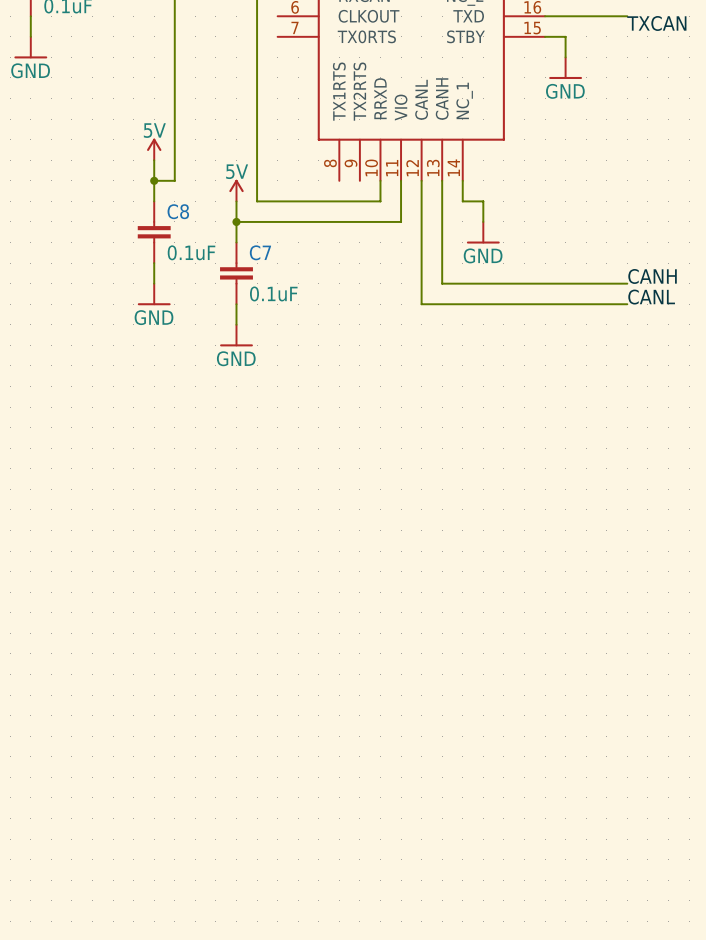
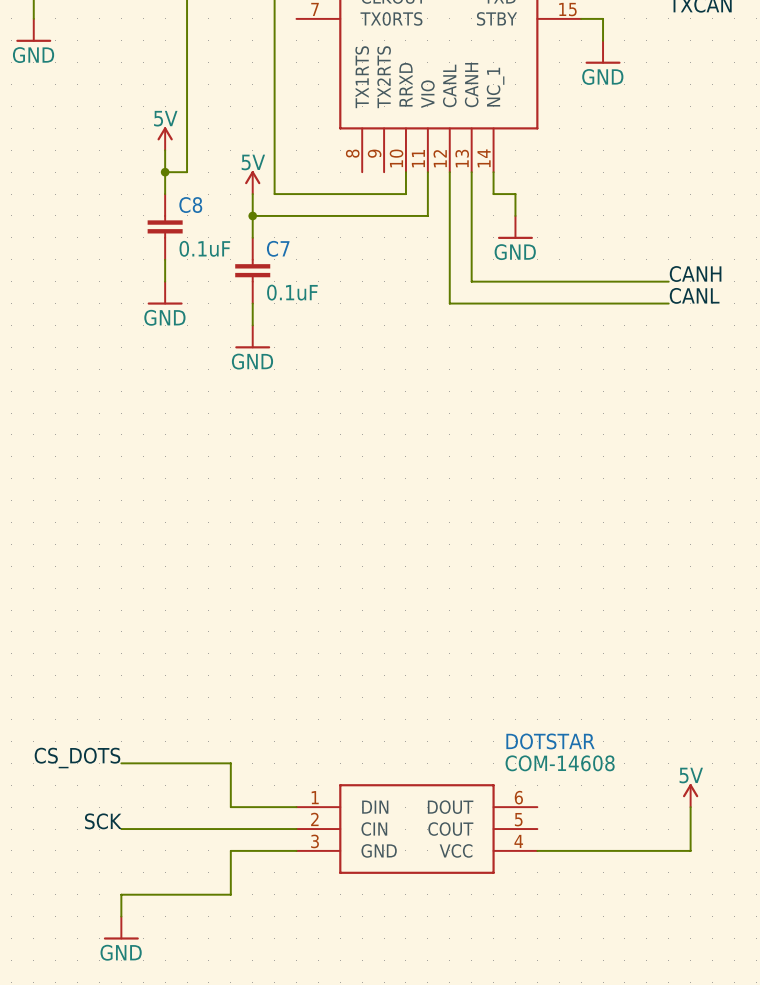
label: none -> CS_DOTS (77, 758)
wire: none -> (121, 763) (230, 763) (230, 807) (296, 807)
power symbol: none -> 5V (690, 795)
wire: none -> (690, 807) (690, 850) (537, 850)
label: none -> SCK (103, 821)
wire: none -> (121, 829) (296, 829)
DOTSTAR: none -> COM-14608 (416, 829)
wire: none -> (296, 850) (230, 850) (230, 894) (121, 894) (121, 916)
power symbol: none -> GND (121, 928)

